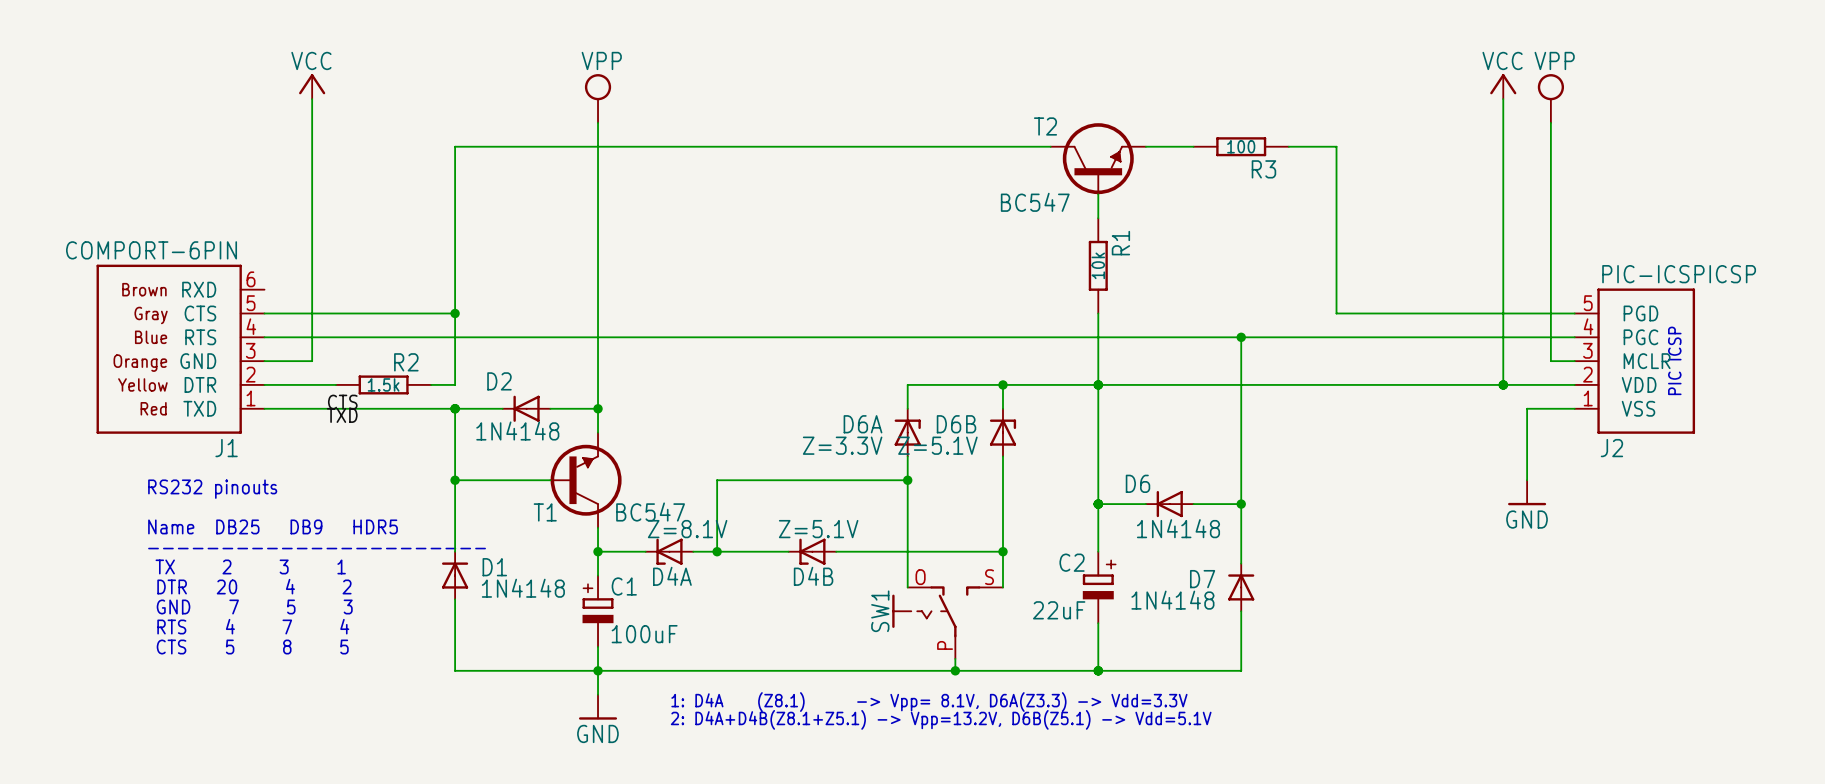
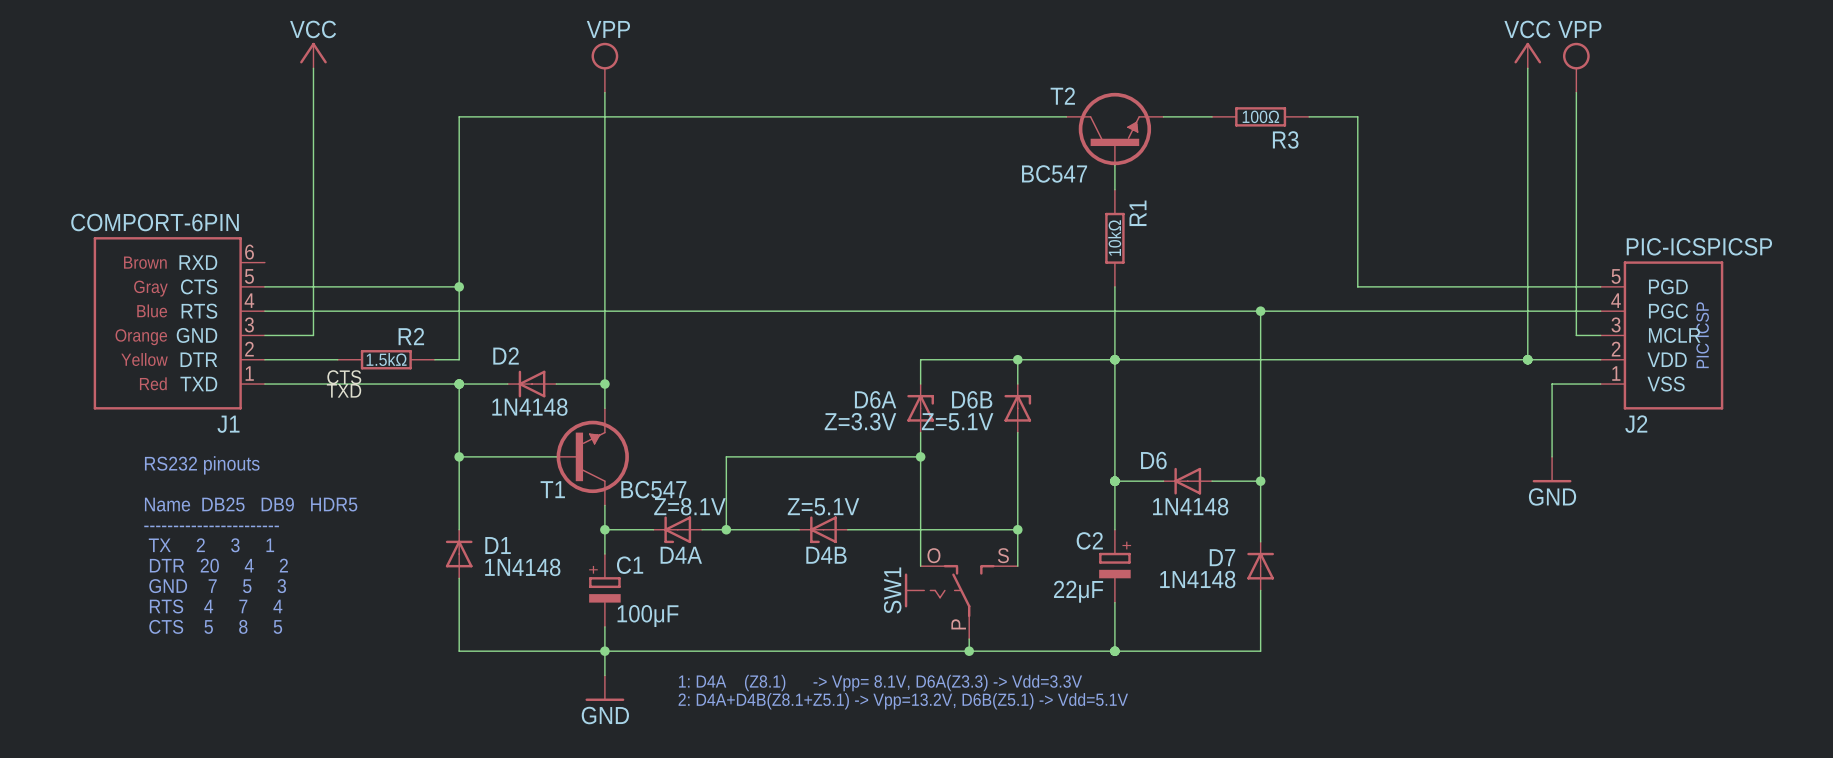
R3 value: 100 (1241, 146) -> 100Ω (1260, 116)
R1 value: 10k (1098, 265) -> 10kΩ (1114, 238)
R2 value: 1.5k (383, 384) -> 1.5kΩ (386, 359)
C2 value: 22uF (1059, 610) -> 22μF (1078, 591)
C1 value: 100uF (644, 634) -> 100μF (647, 616)

